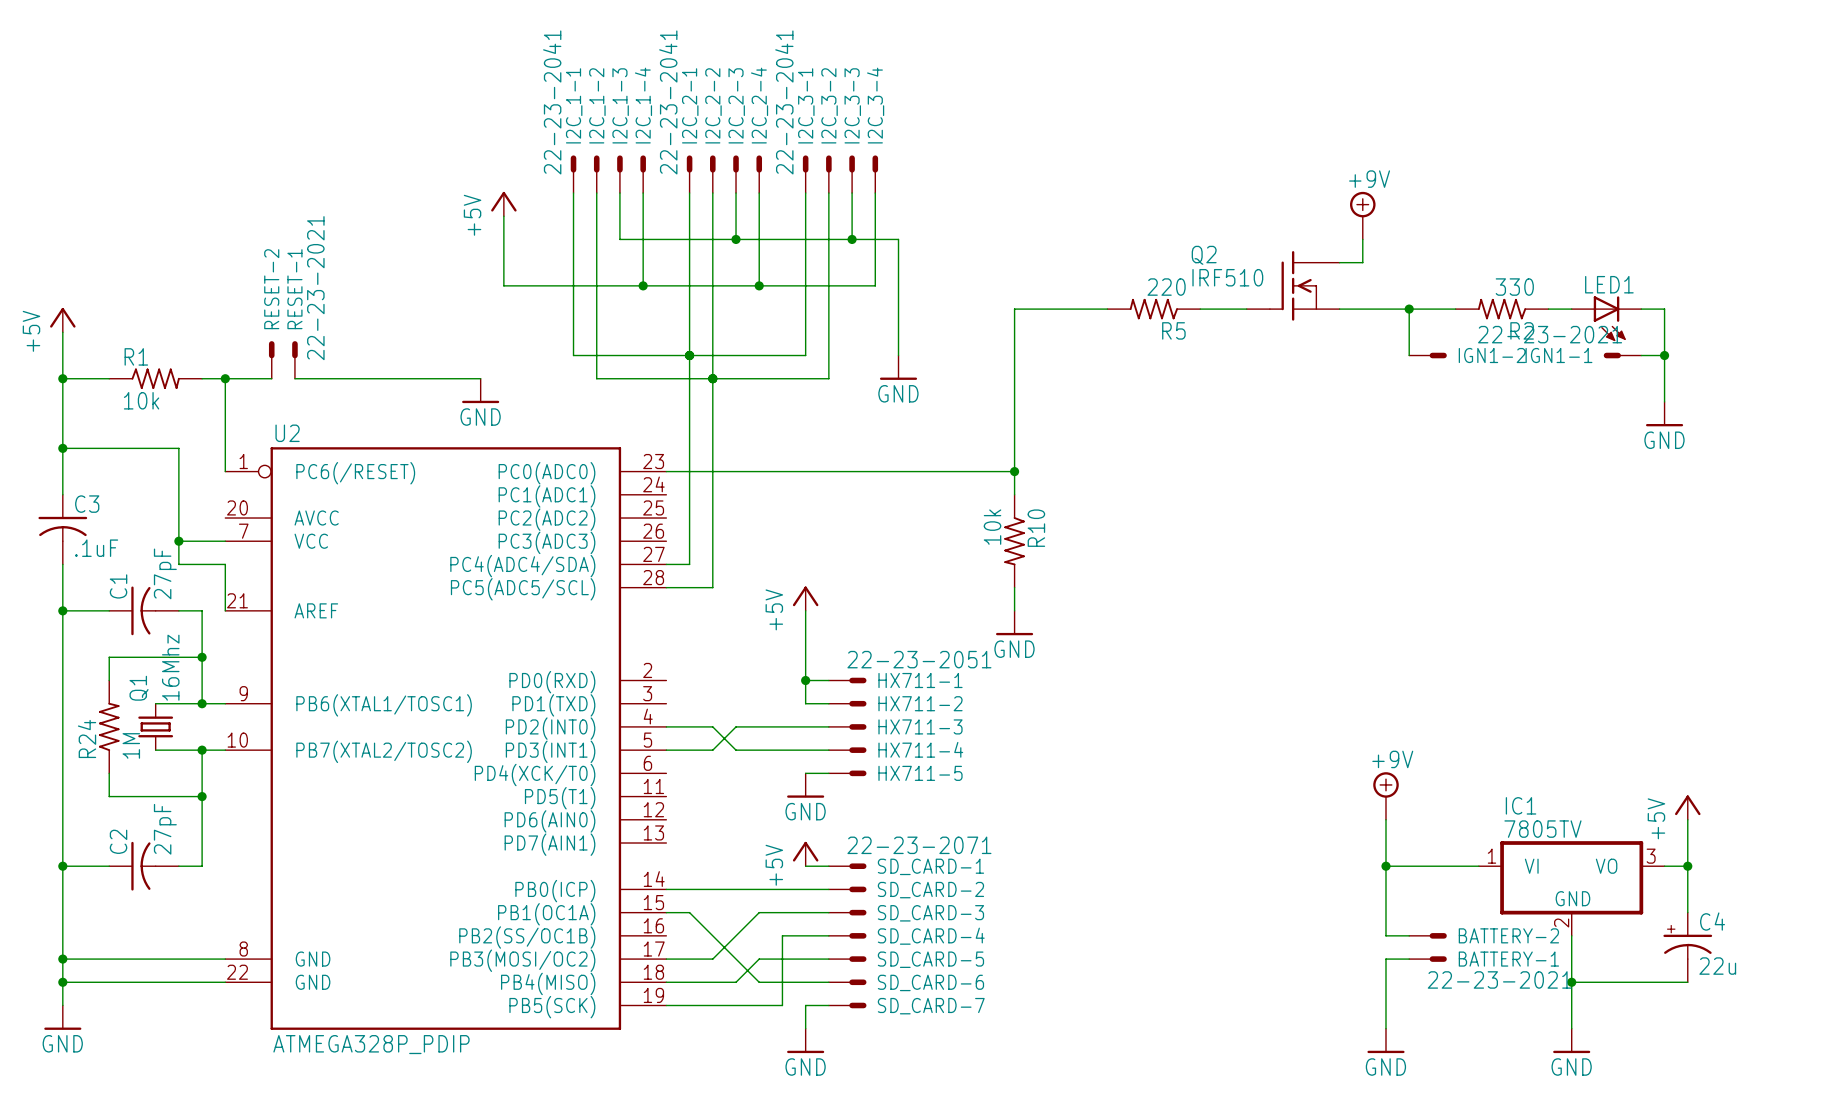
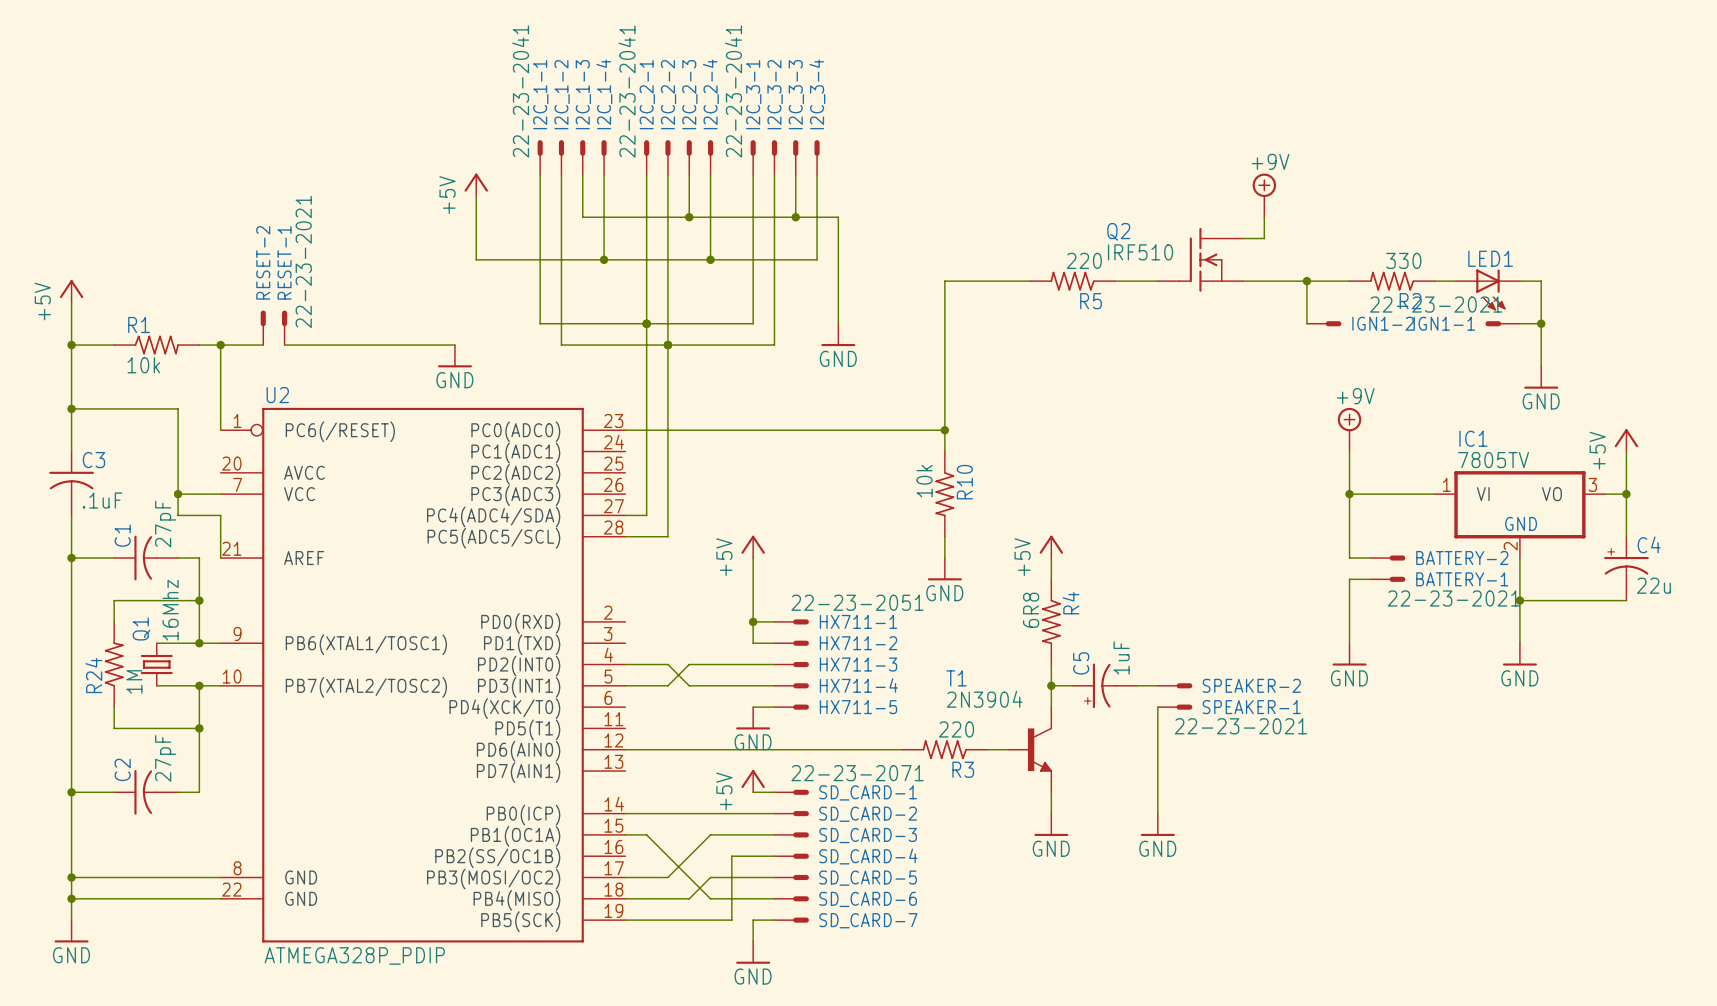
power symbol: none -> +9V (1349, 429)
power symbol: none -> +5V (1626, 440)
wire: none -> (1349, 451) (1349, 558) (1370, 558)
wire: none -> (1626, 451) (1626, 536)
wire: none -> (1349, 494) (1434, 494)
junction: none -> (1349, 494)
wire: none -> (1605, 494) (1626, 494)
junction: none -> (1626, 494)
power symbol: none -> +5V (1051, 546)
wire: none -> (1051, 558) (1051, 579)
wire: none -> (1370, 579) (1349, 579) (1349, 643)
wire: none -> (1519, 600) (1626, 600)
junction: none -> (1519, 600)
R4: none -> 6R8 (1051, 621)
power symbol: none -> GND (1349, 654)
power symbol: none -> GND (1519, 654)
wire: none -> (1051, 664) (1051, 707)
wire: none -> (1051, 685) (1072, 685)
junction: none -> (1051, 685)
C5: none -> 1uF (1104, 685)
wire: none -> (1136, 685) (1157, 685)
SPEAKER-2: none -> (1175, 685)
wire: none -> (1157, 707) (1157, 813)
SPEAKER-1: none -> 22-23-2021 (1175, 707)
power symbol: +9V (1385, 795) -> none
power symbol: +5V (1687, 807) -> none
wire: none -> (625, 749) (902, 749)
R3: none -> 220 (944, 749)
wire: none -> (987, 749) (1008, 749)
T1: none -> 2N3904 (1030, 749)
wire: (1385, 819) (1385, 935) (1409, 935) -> none
wire: (1687, 819) (1687, 912) -> (1519, 558) (1519, 643)
wire: none -> (1051, 792) (1051, 813)
wire: (1385, 866) (1478, 866) -> none
junction: (1385, 866) -> none
wire: (1664, 866) (1687, 866) -> none
junction: (1687, 866) -> none
IC1 position: (1571, 888) -> (1519, 514)
power symbol: none -> GND (1051, 824)
power symbol: none -> GND (1157, 824)
BATTERY-2 position: (1428, 935) -> (1388, 558)
wire: (1571, 935) (1571, 1028) -> none
C4 position: (1687, 947) -> (1626, 568)
wire: (1409, 959) (1385, 959) (1385, 1028) -> none
BATTERY-1 position: (1428, 959) -> (1388, 579)
wire: (1571, 982) (1687, 982) -> none
junction: (1571, 982) -> none
power symbol: GND (1385, 1040) -> none
power symbol: GND (1571, 1040) -> none

